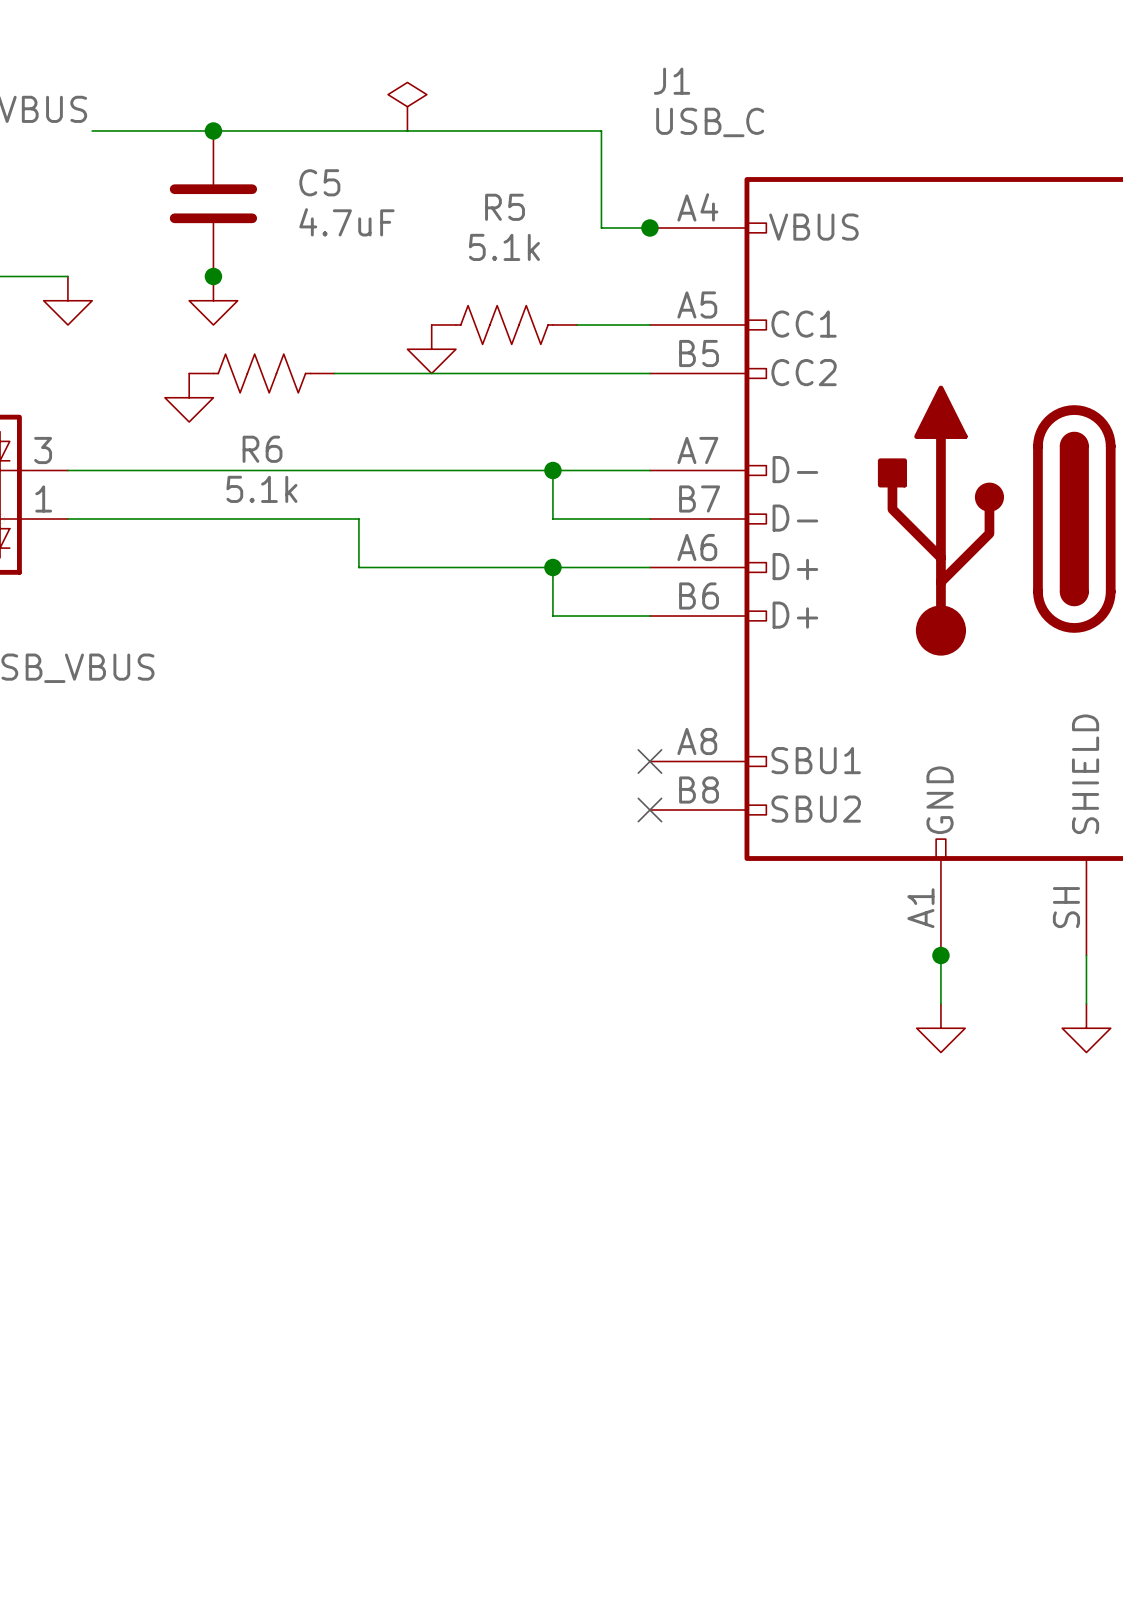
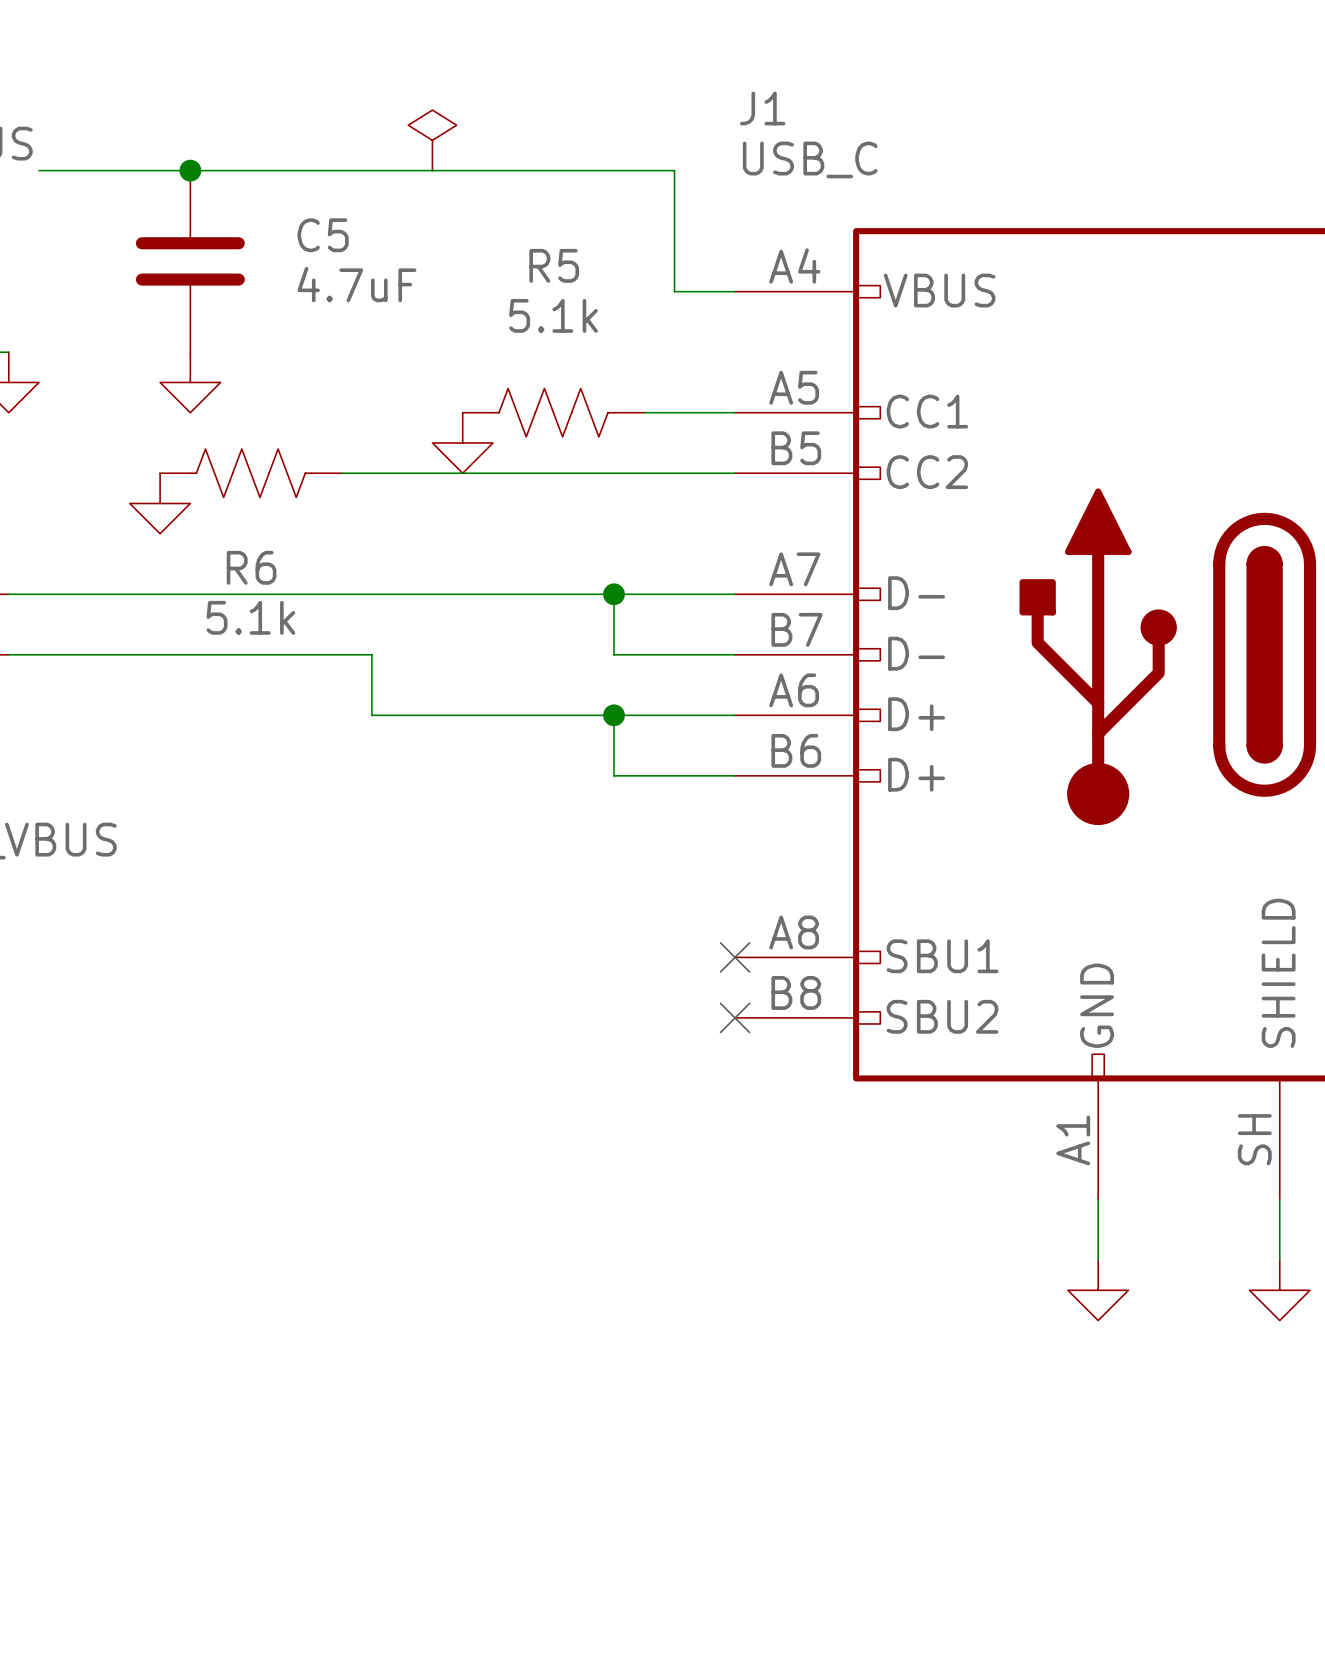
junction: (649, 227) -> none
junction: (213, 276) -> none
junction: (940, 955) -> none

